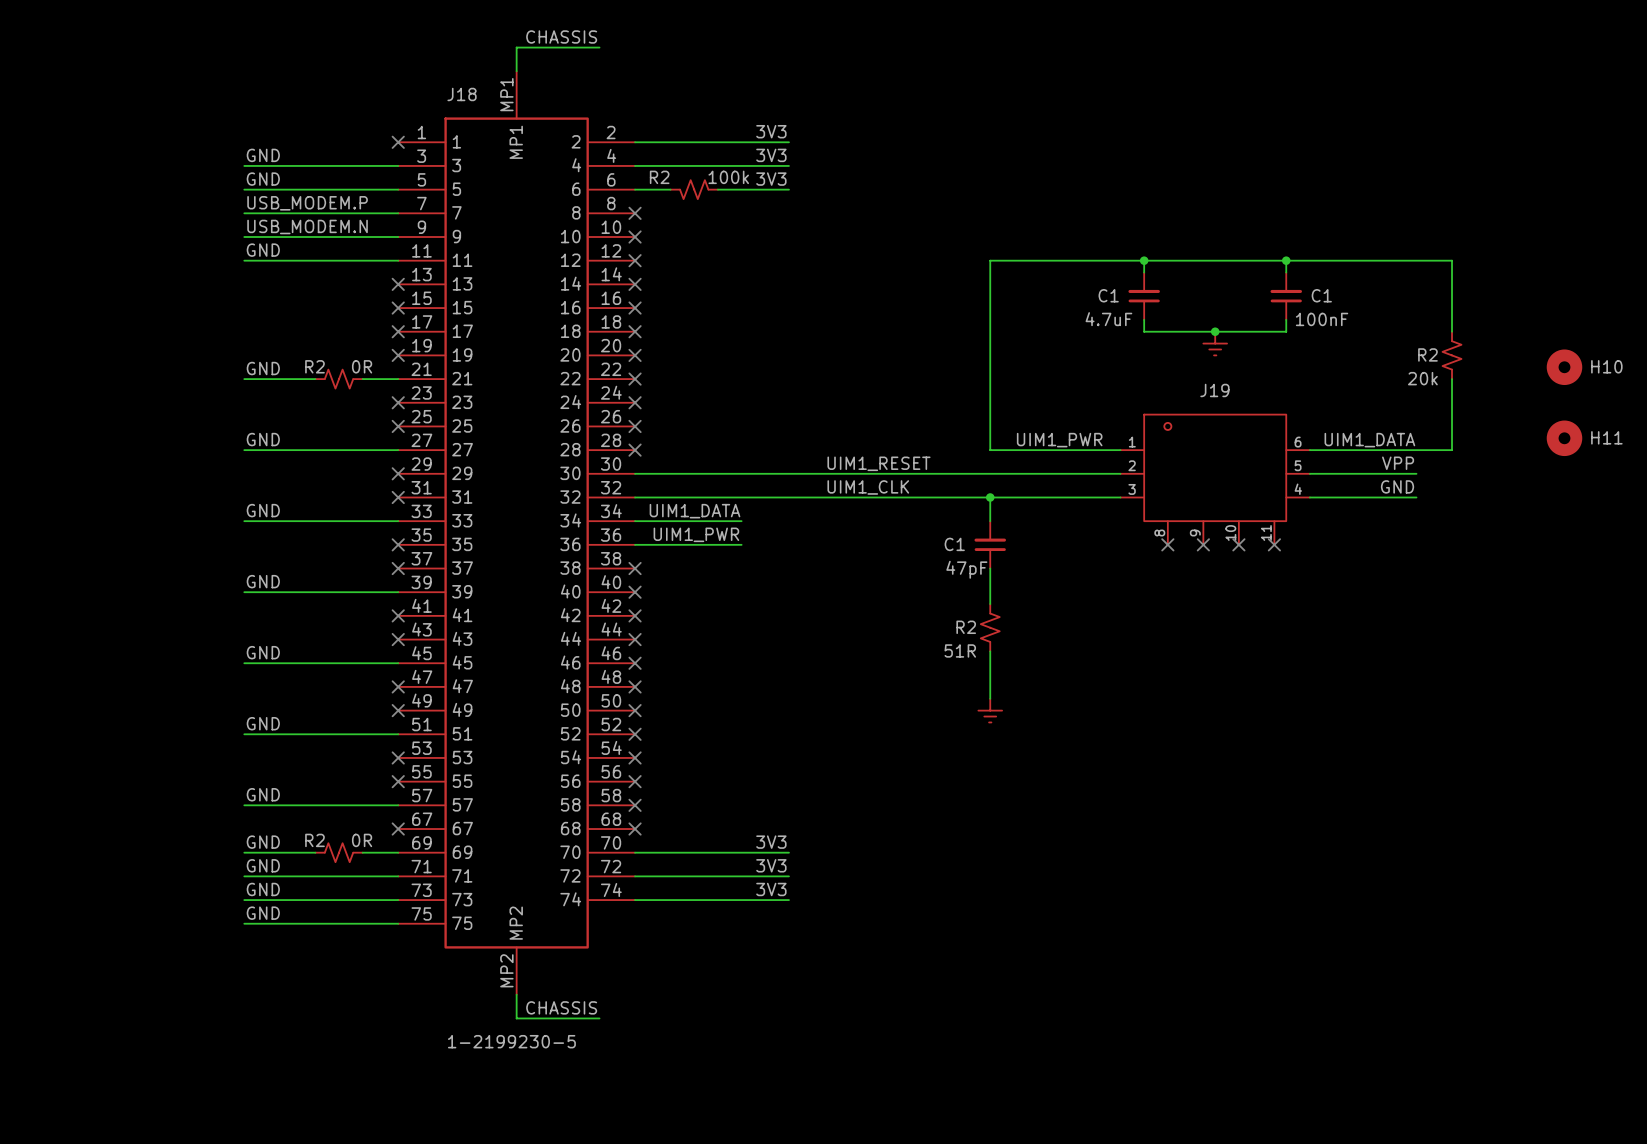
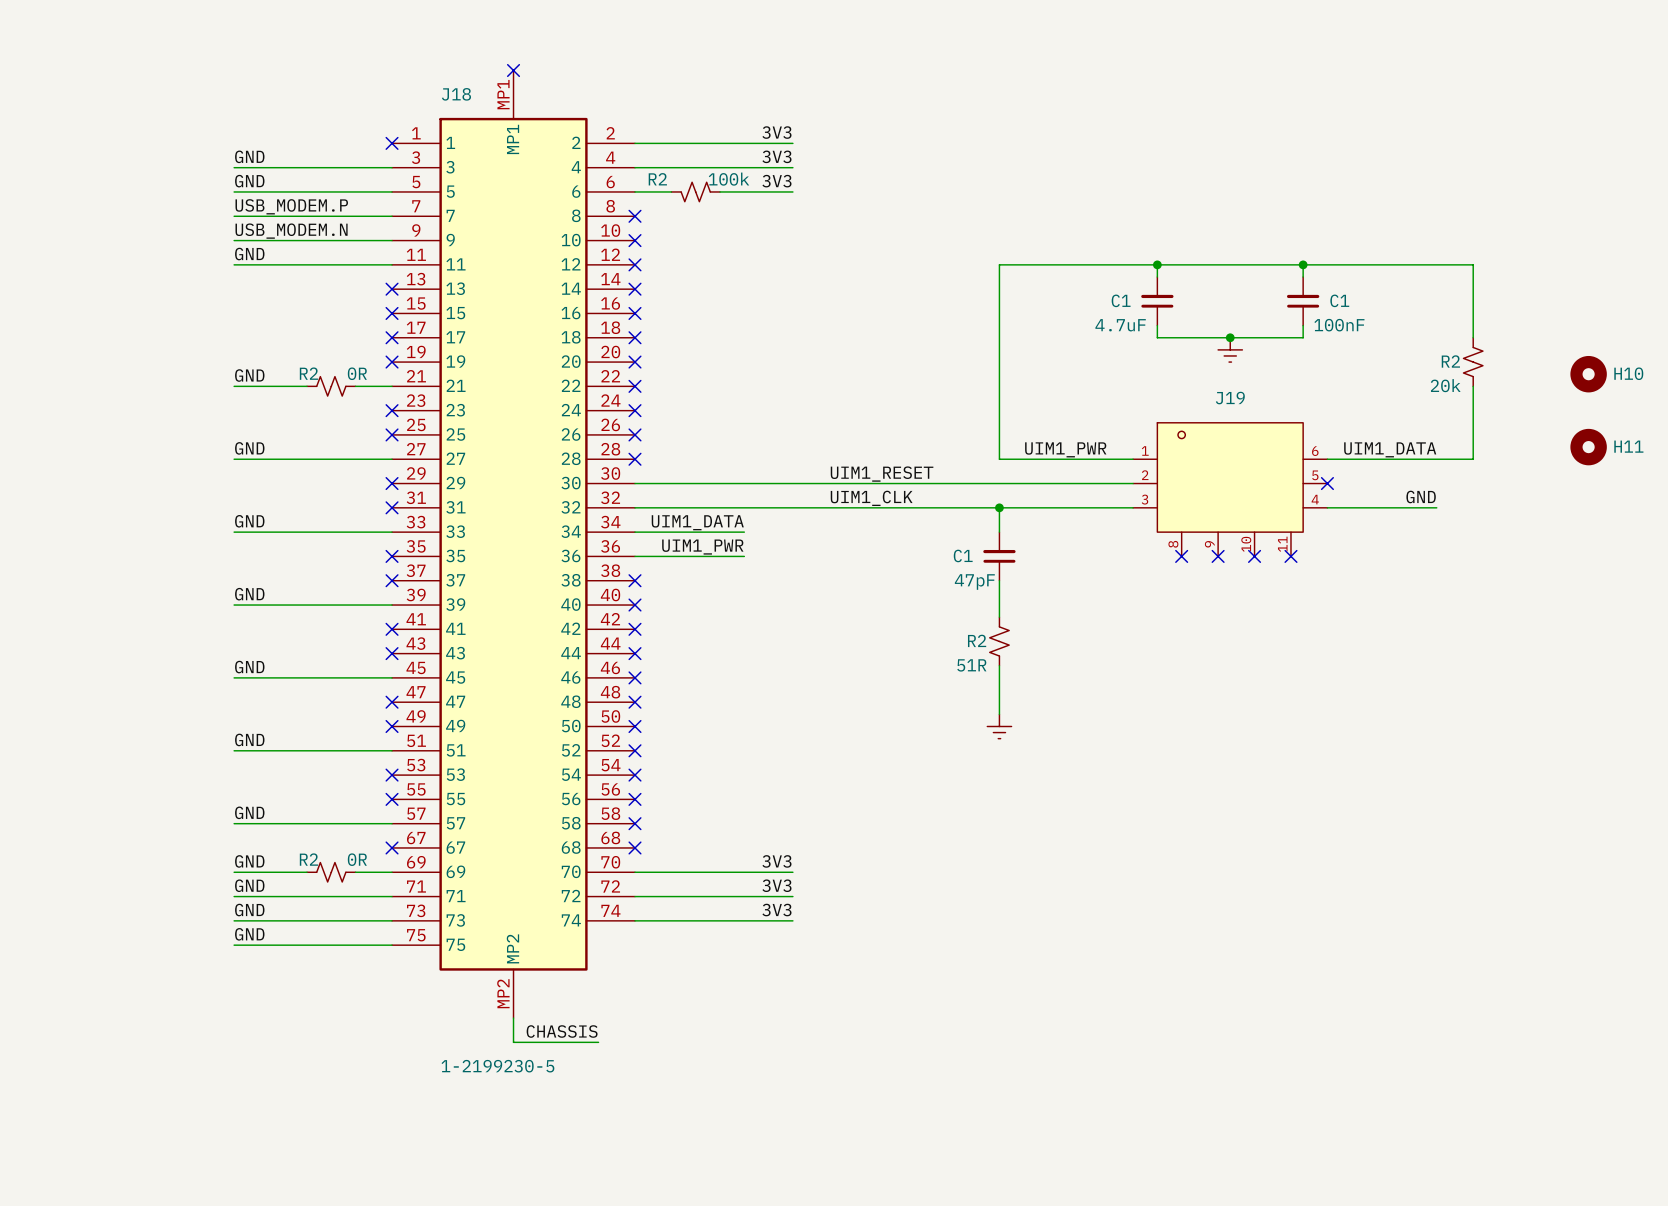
label: CHASSIS (561, 36) -> none
wire: (599, 47) (516, 47) (516, 71) -> none
no-connect mark: none -> (513, 70)
label: VPP (1398, 463) -> none
wire: (1309, 473) (1416, 473) -> none
no-connect mark: none -> (1327, 483)

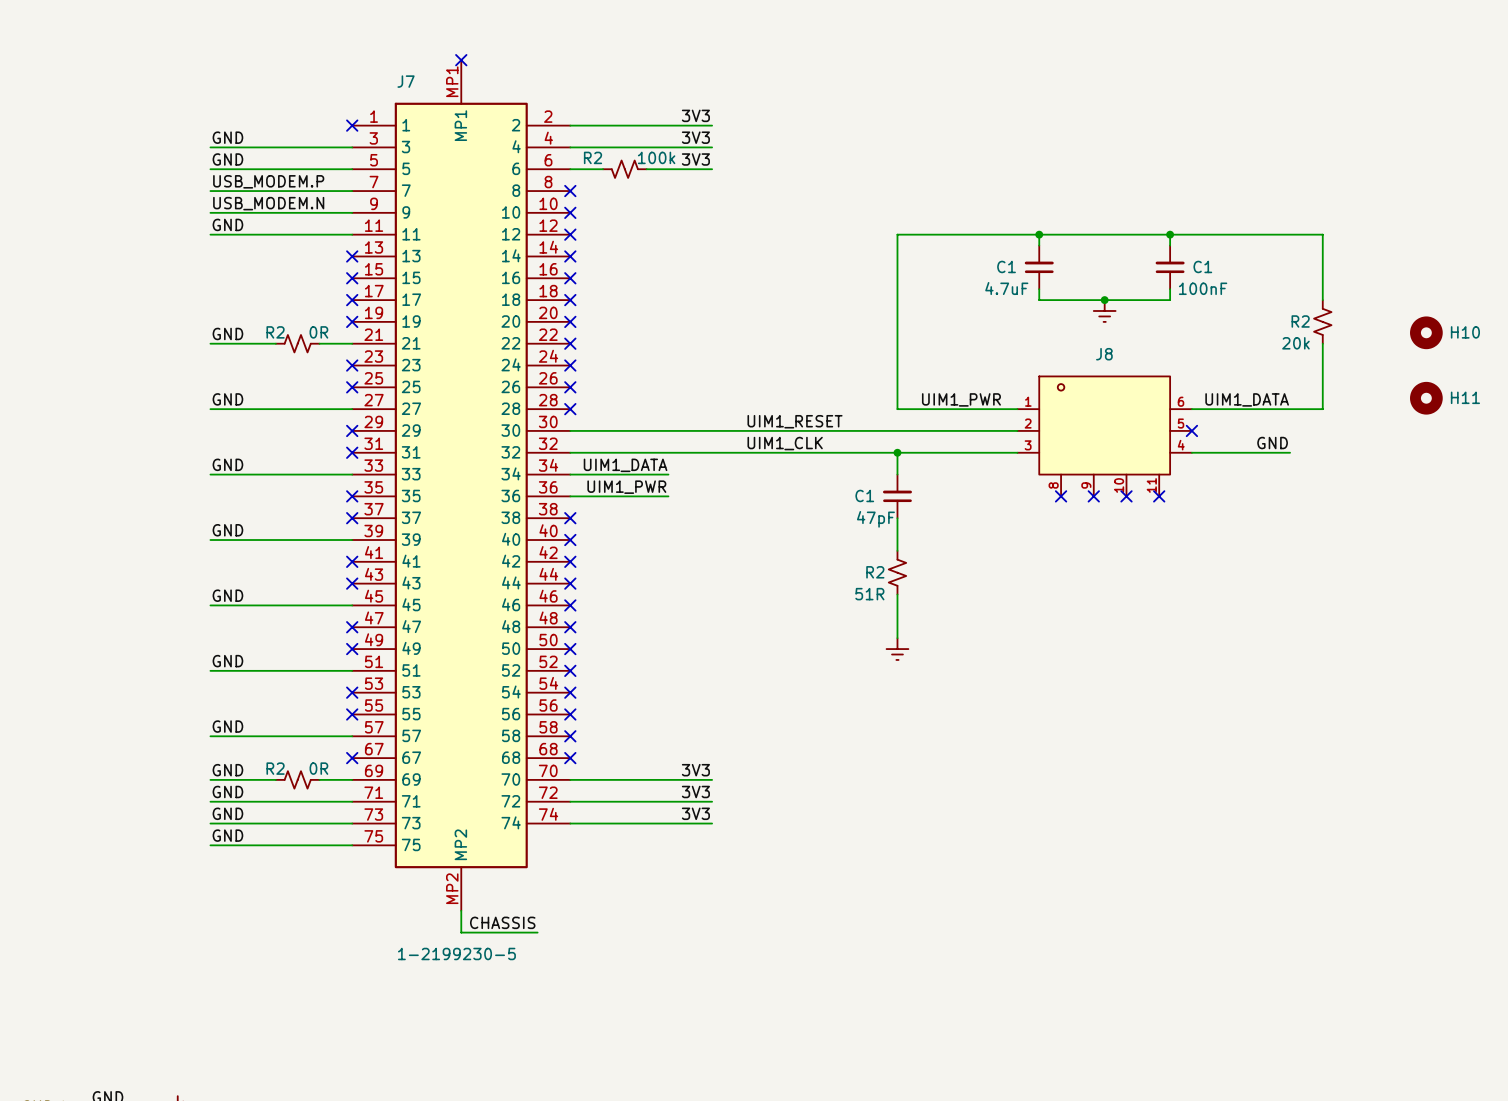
J18 name: J18 (456, 94) -> J7 (406, 81)
J19 name: J19 (1230, 398) -> J8 (1104, 354)

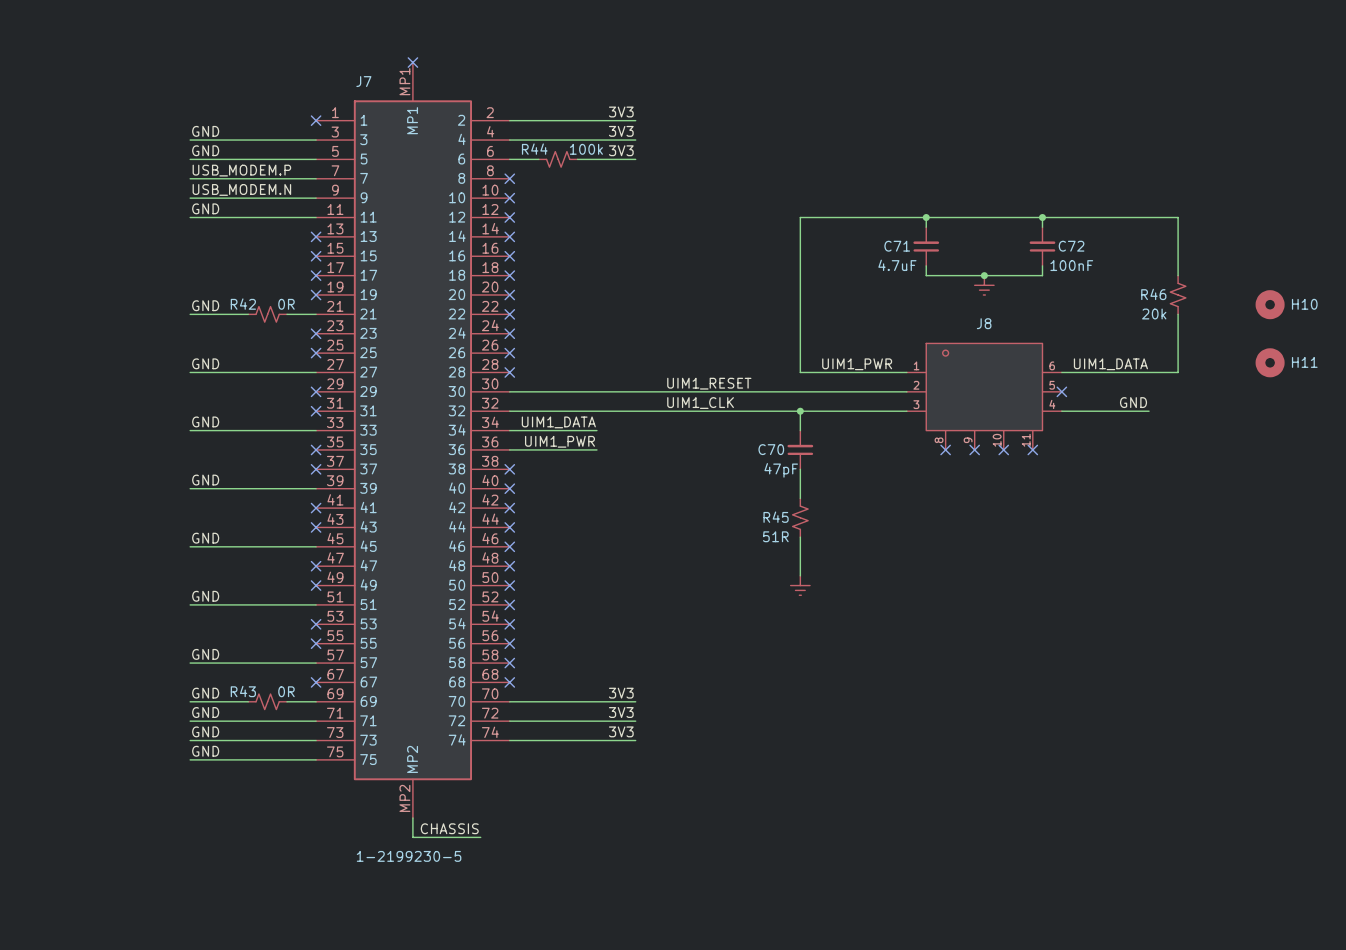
R2 name: R2 (593, 157) -> R44 (534, 149)
C1 name: C1 (1006, 266) -> C71 (897, 246)
C1 name: C1 (1202, 266) -> C72 (1071, 246)
R2 name: R2 (1300, 321) -> R46 (1153, 294)
R2 name: R2 (275, 332) -> R42 (243, 304)
C1 name: C1 (864, 495) -> C70 (771, 449)
R2 name: R2 (875, 572) -> R45 (776, 517)
R2 name: R2 (275, 768) -> R43 (243, 691)

